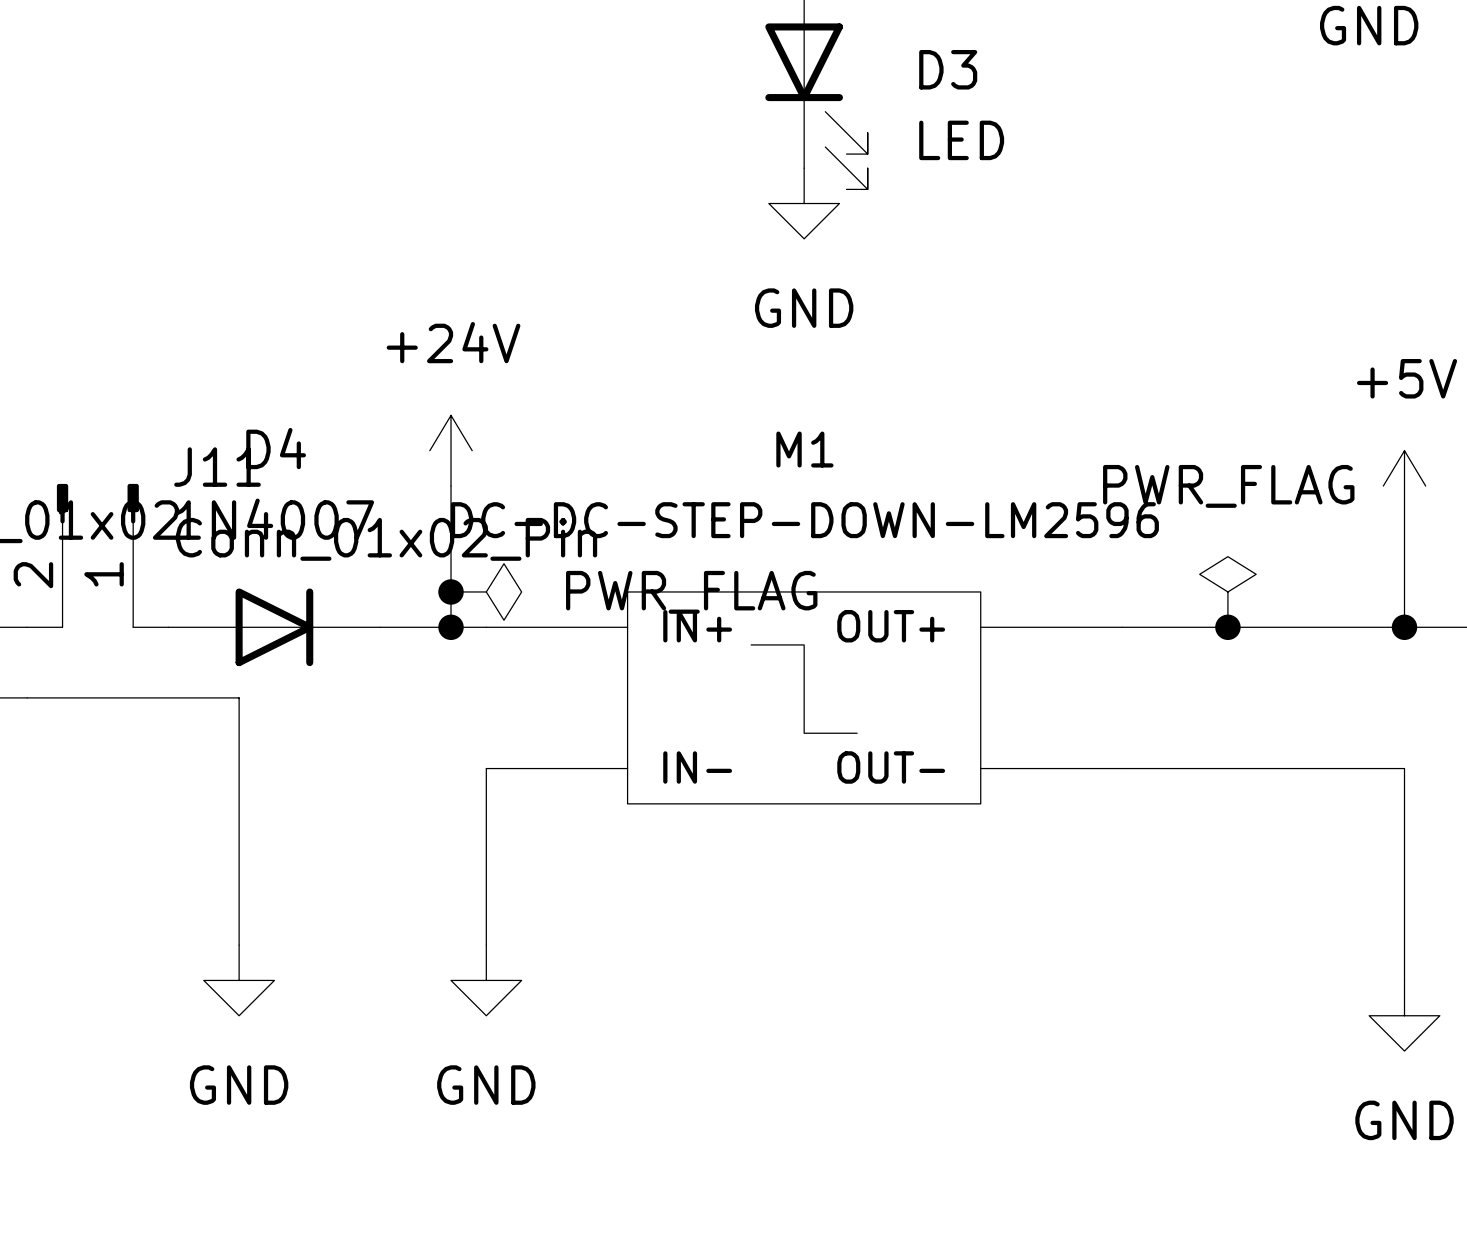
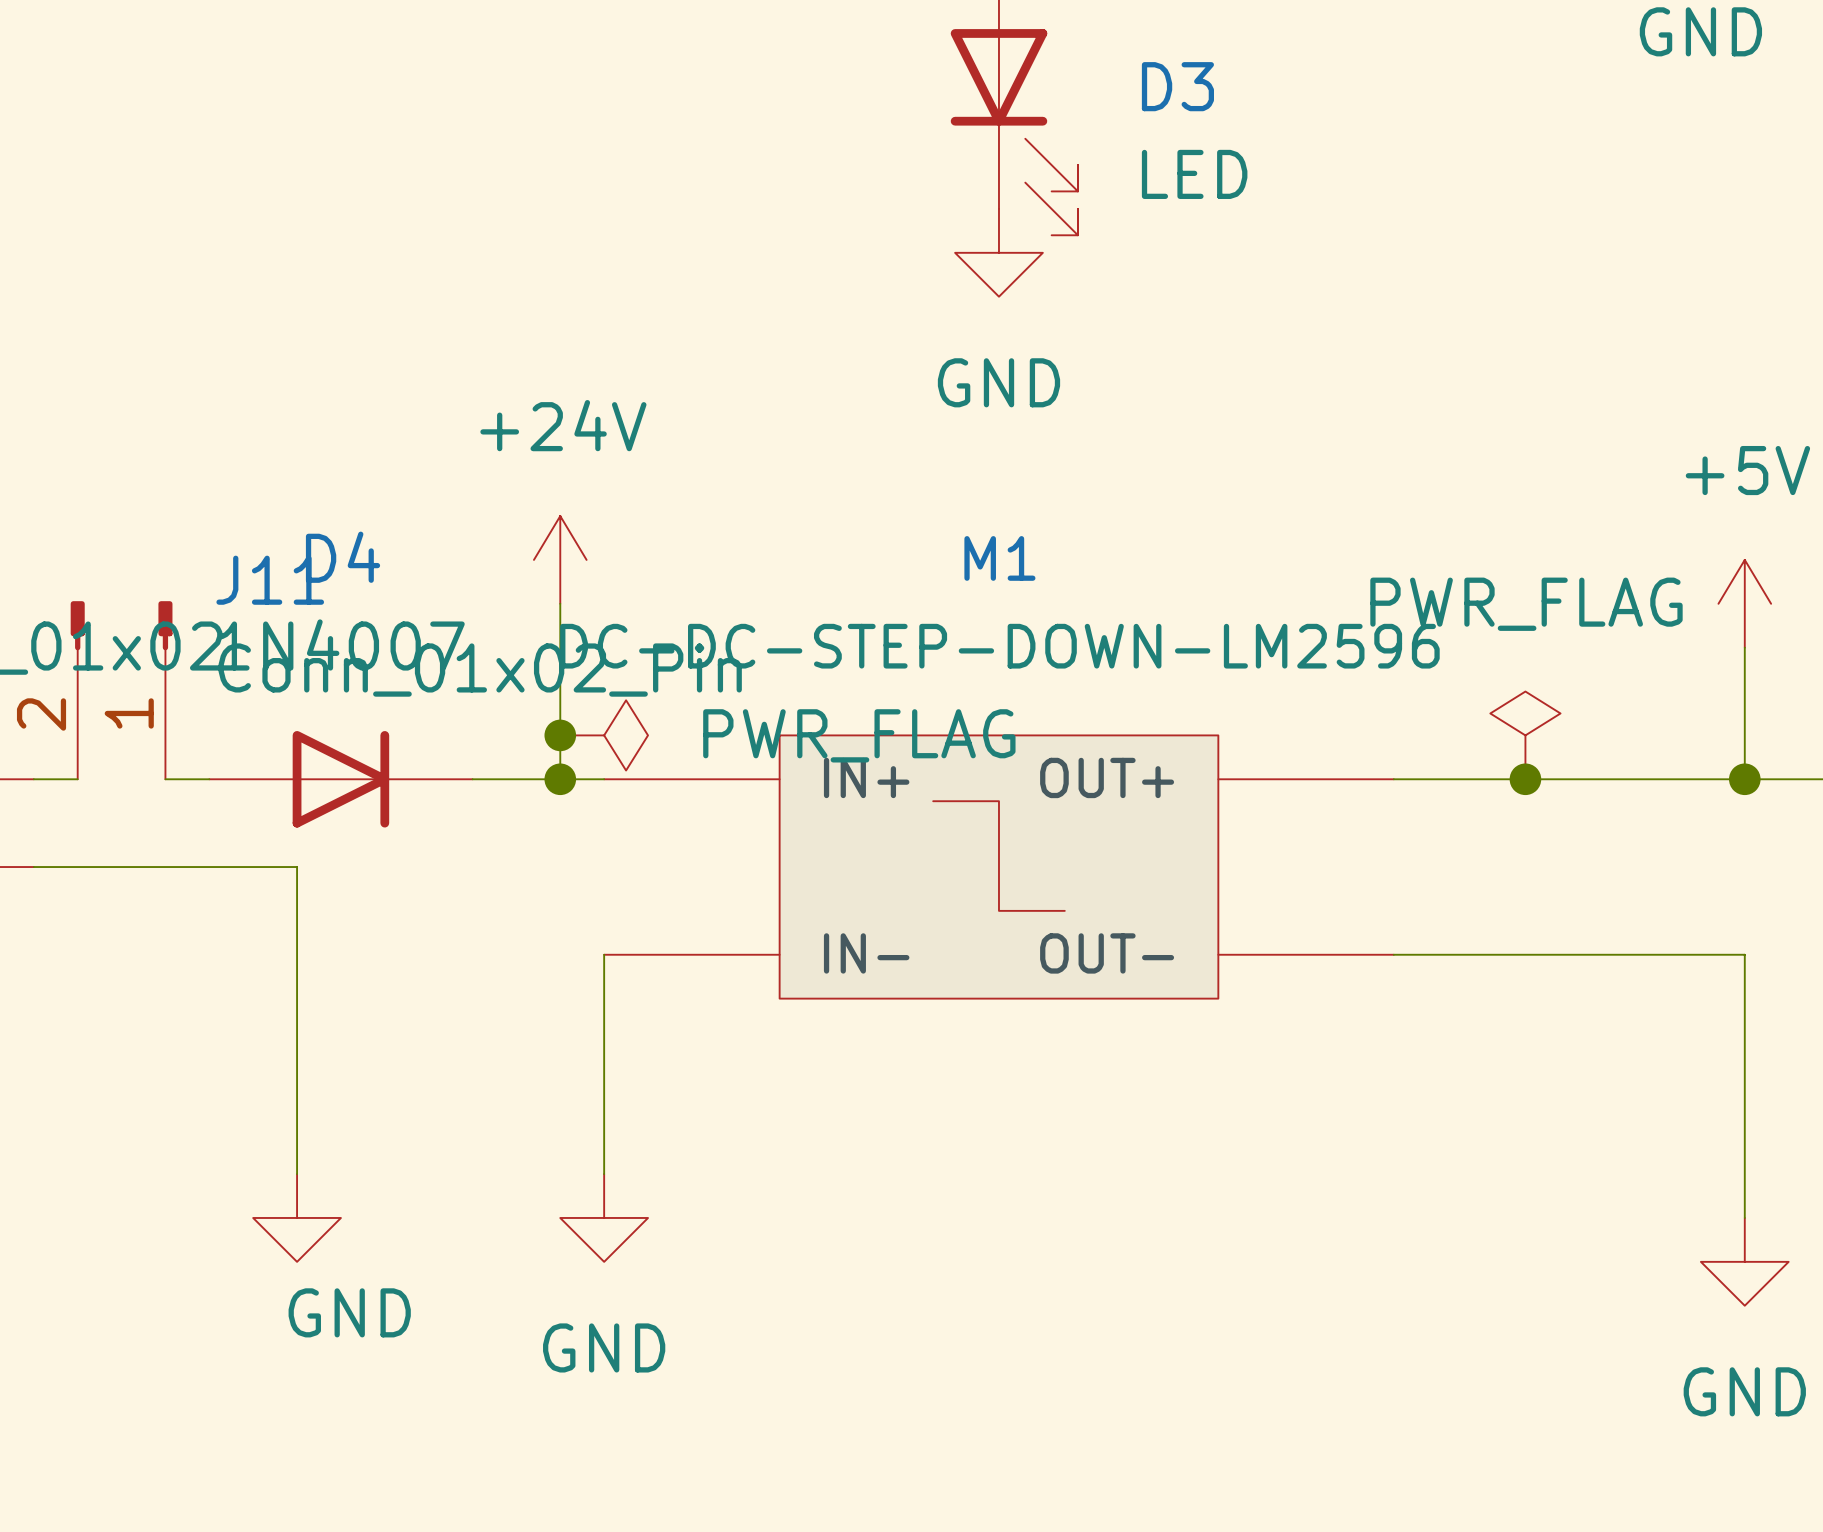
power symbol text position: GND (239, 1085) -> GND (349, 1312)

